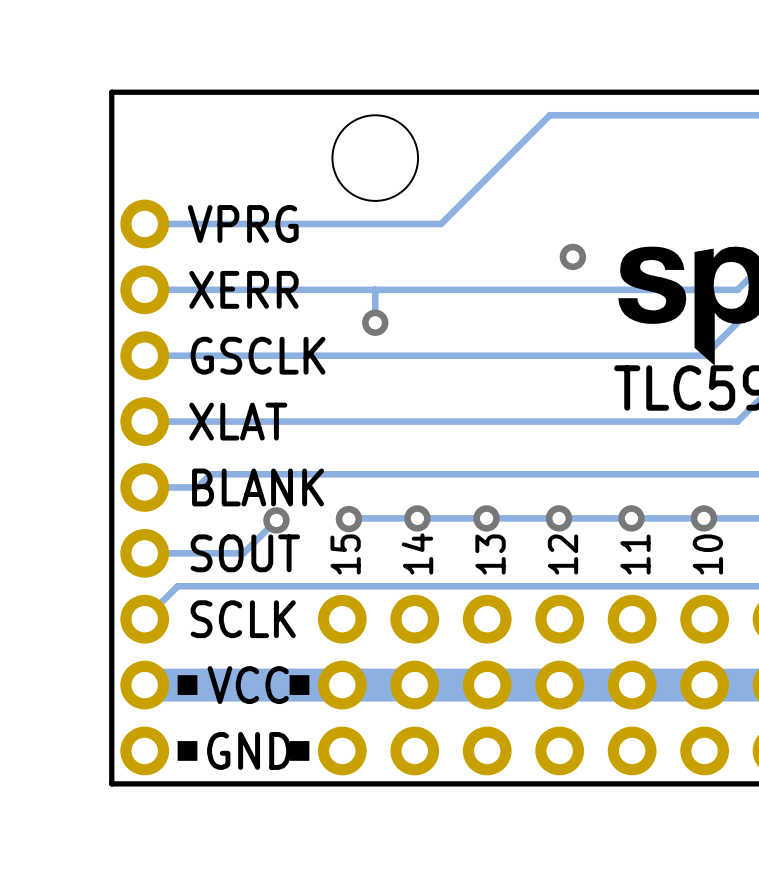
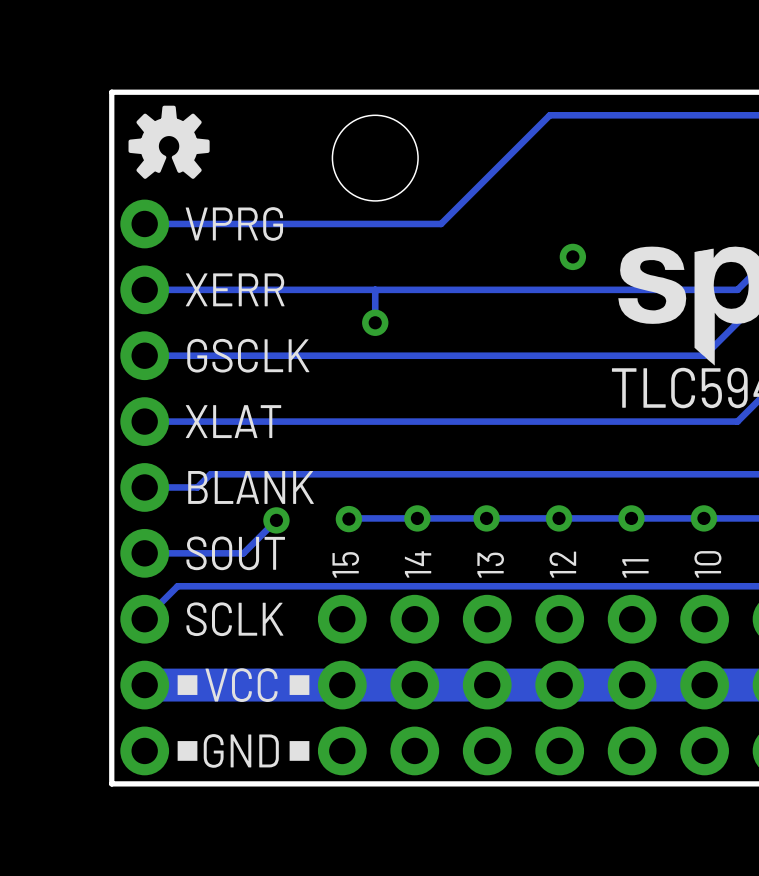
drawing: none -> [128, 105, 210, 179]

